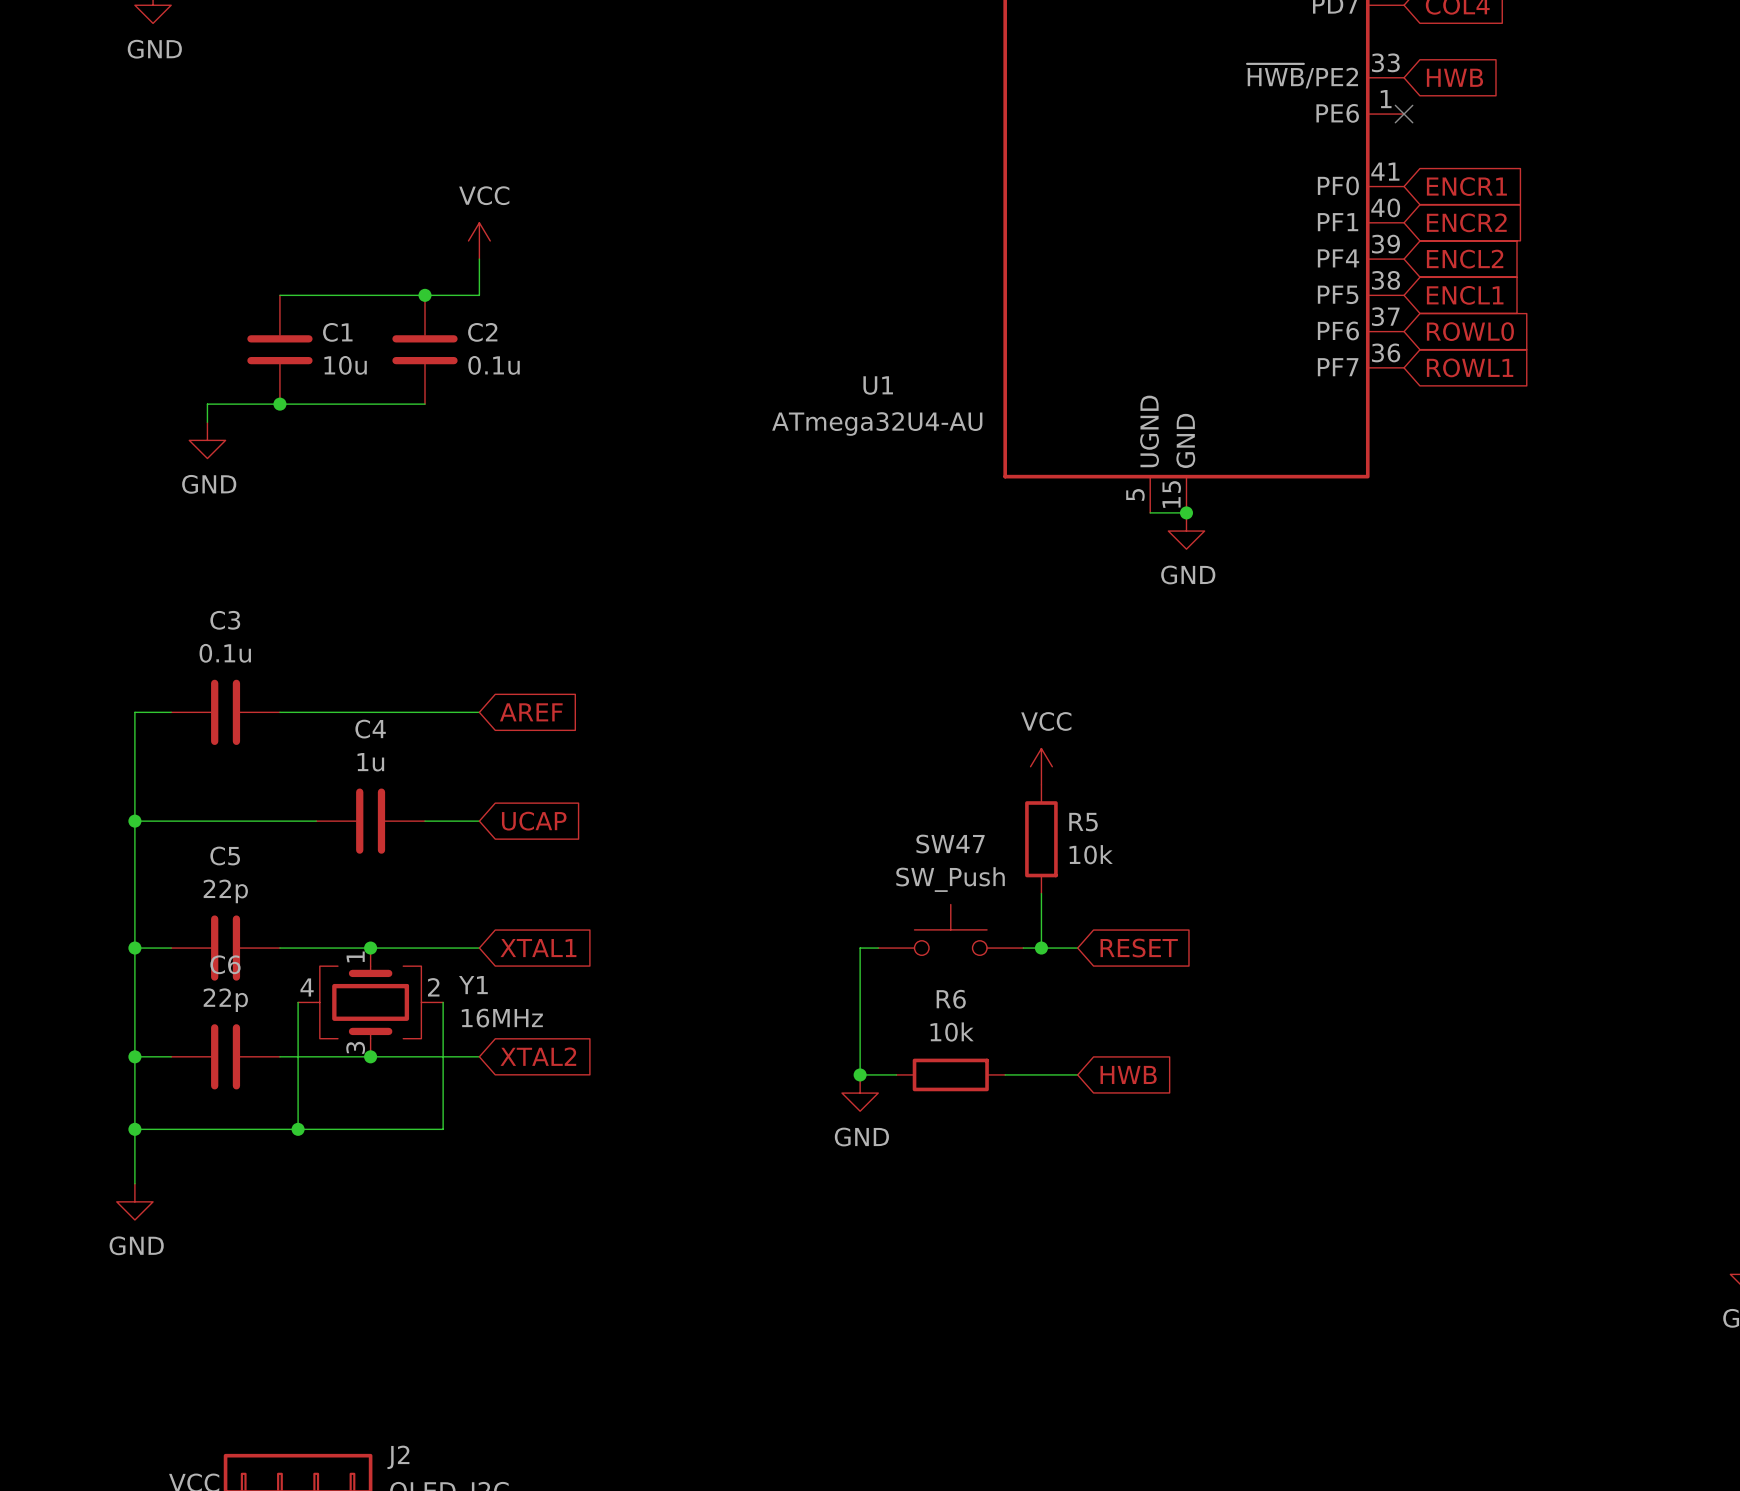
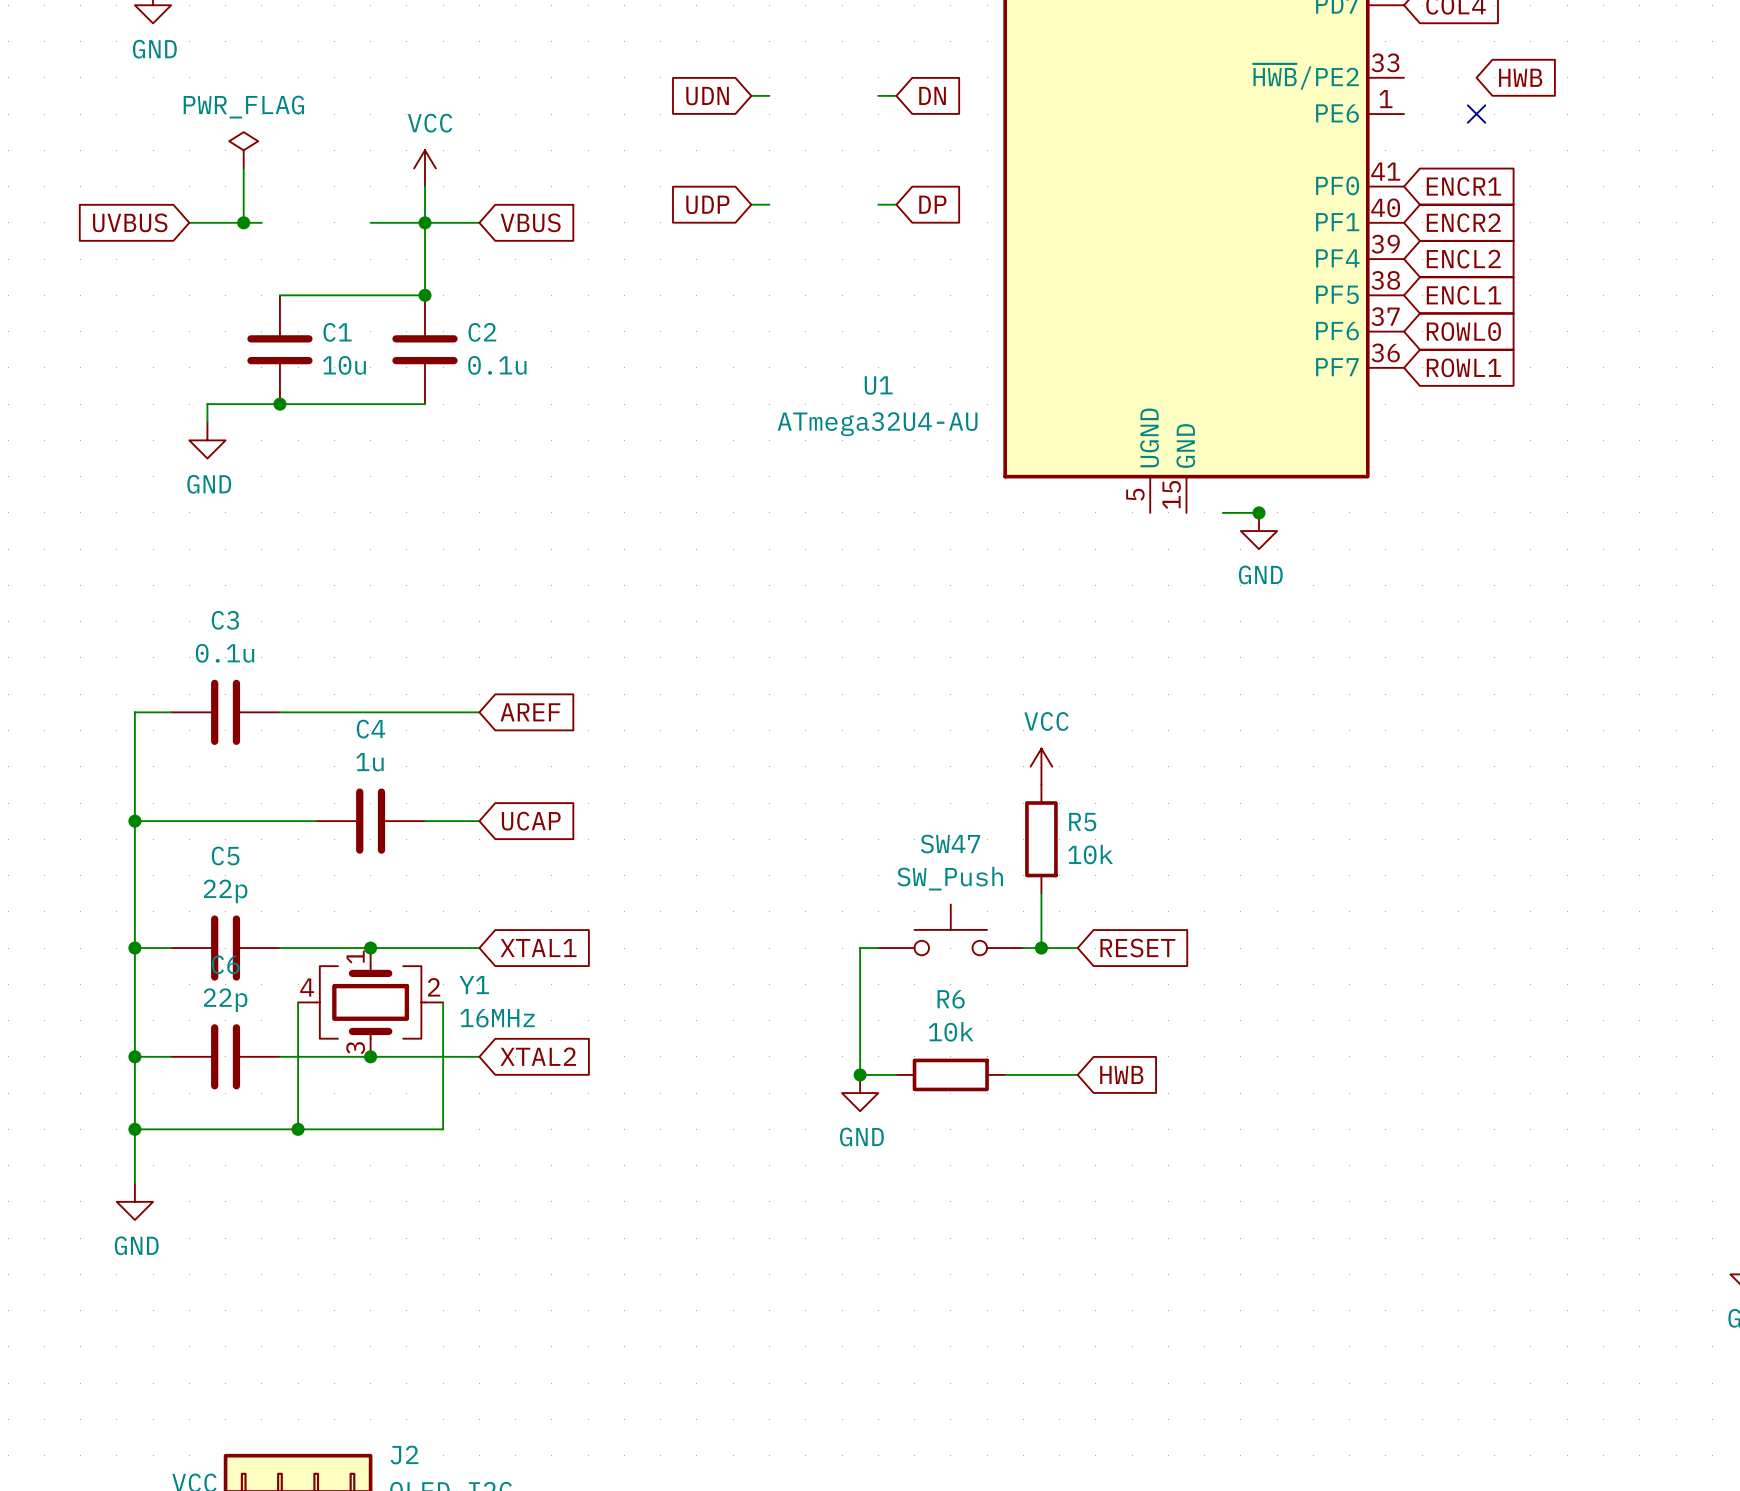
global label position: HWB (1454, 77) -> HWB (1520, 77)
wire: none -> (751, 95) (769, 95)
wire: none -> (878, 95) (896, 95)
global label: none -> DN (932, 95)
global label: none -> UDN (707, 96)
no-connect mark position: (1404, 114) -> (1476, 114)
power symbol: none -> PWR_FLAG (243, 150)
wire: none -> (243, 168) (243, 222)
global label: none -> UDP (707, 204)
wire: none -> (751, 204) (769, 204)
wire: none -> (878, 204) (896, 204)
global label: none -> DP (932, 204)
global label: none -> UVBUS (130, 222)
wire: none -> (189, 222) (261, 222)
junction: none -> (243, 222)
wire: none -> (370, 222) (479, 222)
junction: none -> (425, 222)
global label: none -> VBUS (530, 222)
power symbol position: VCC (479, 240) -> VCC (425, 168)
wire: (479, 259) (479, 295) (425, 295) -> (425, 186) (425, 295)
wire: (1150, 512) (1186, 512) -> (1222, 512) (1259, 512)
junction position: (1186, 512) -> (1259, 512)
power symbol position: GND (1186, 531) -> GND (1259, 531)

